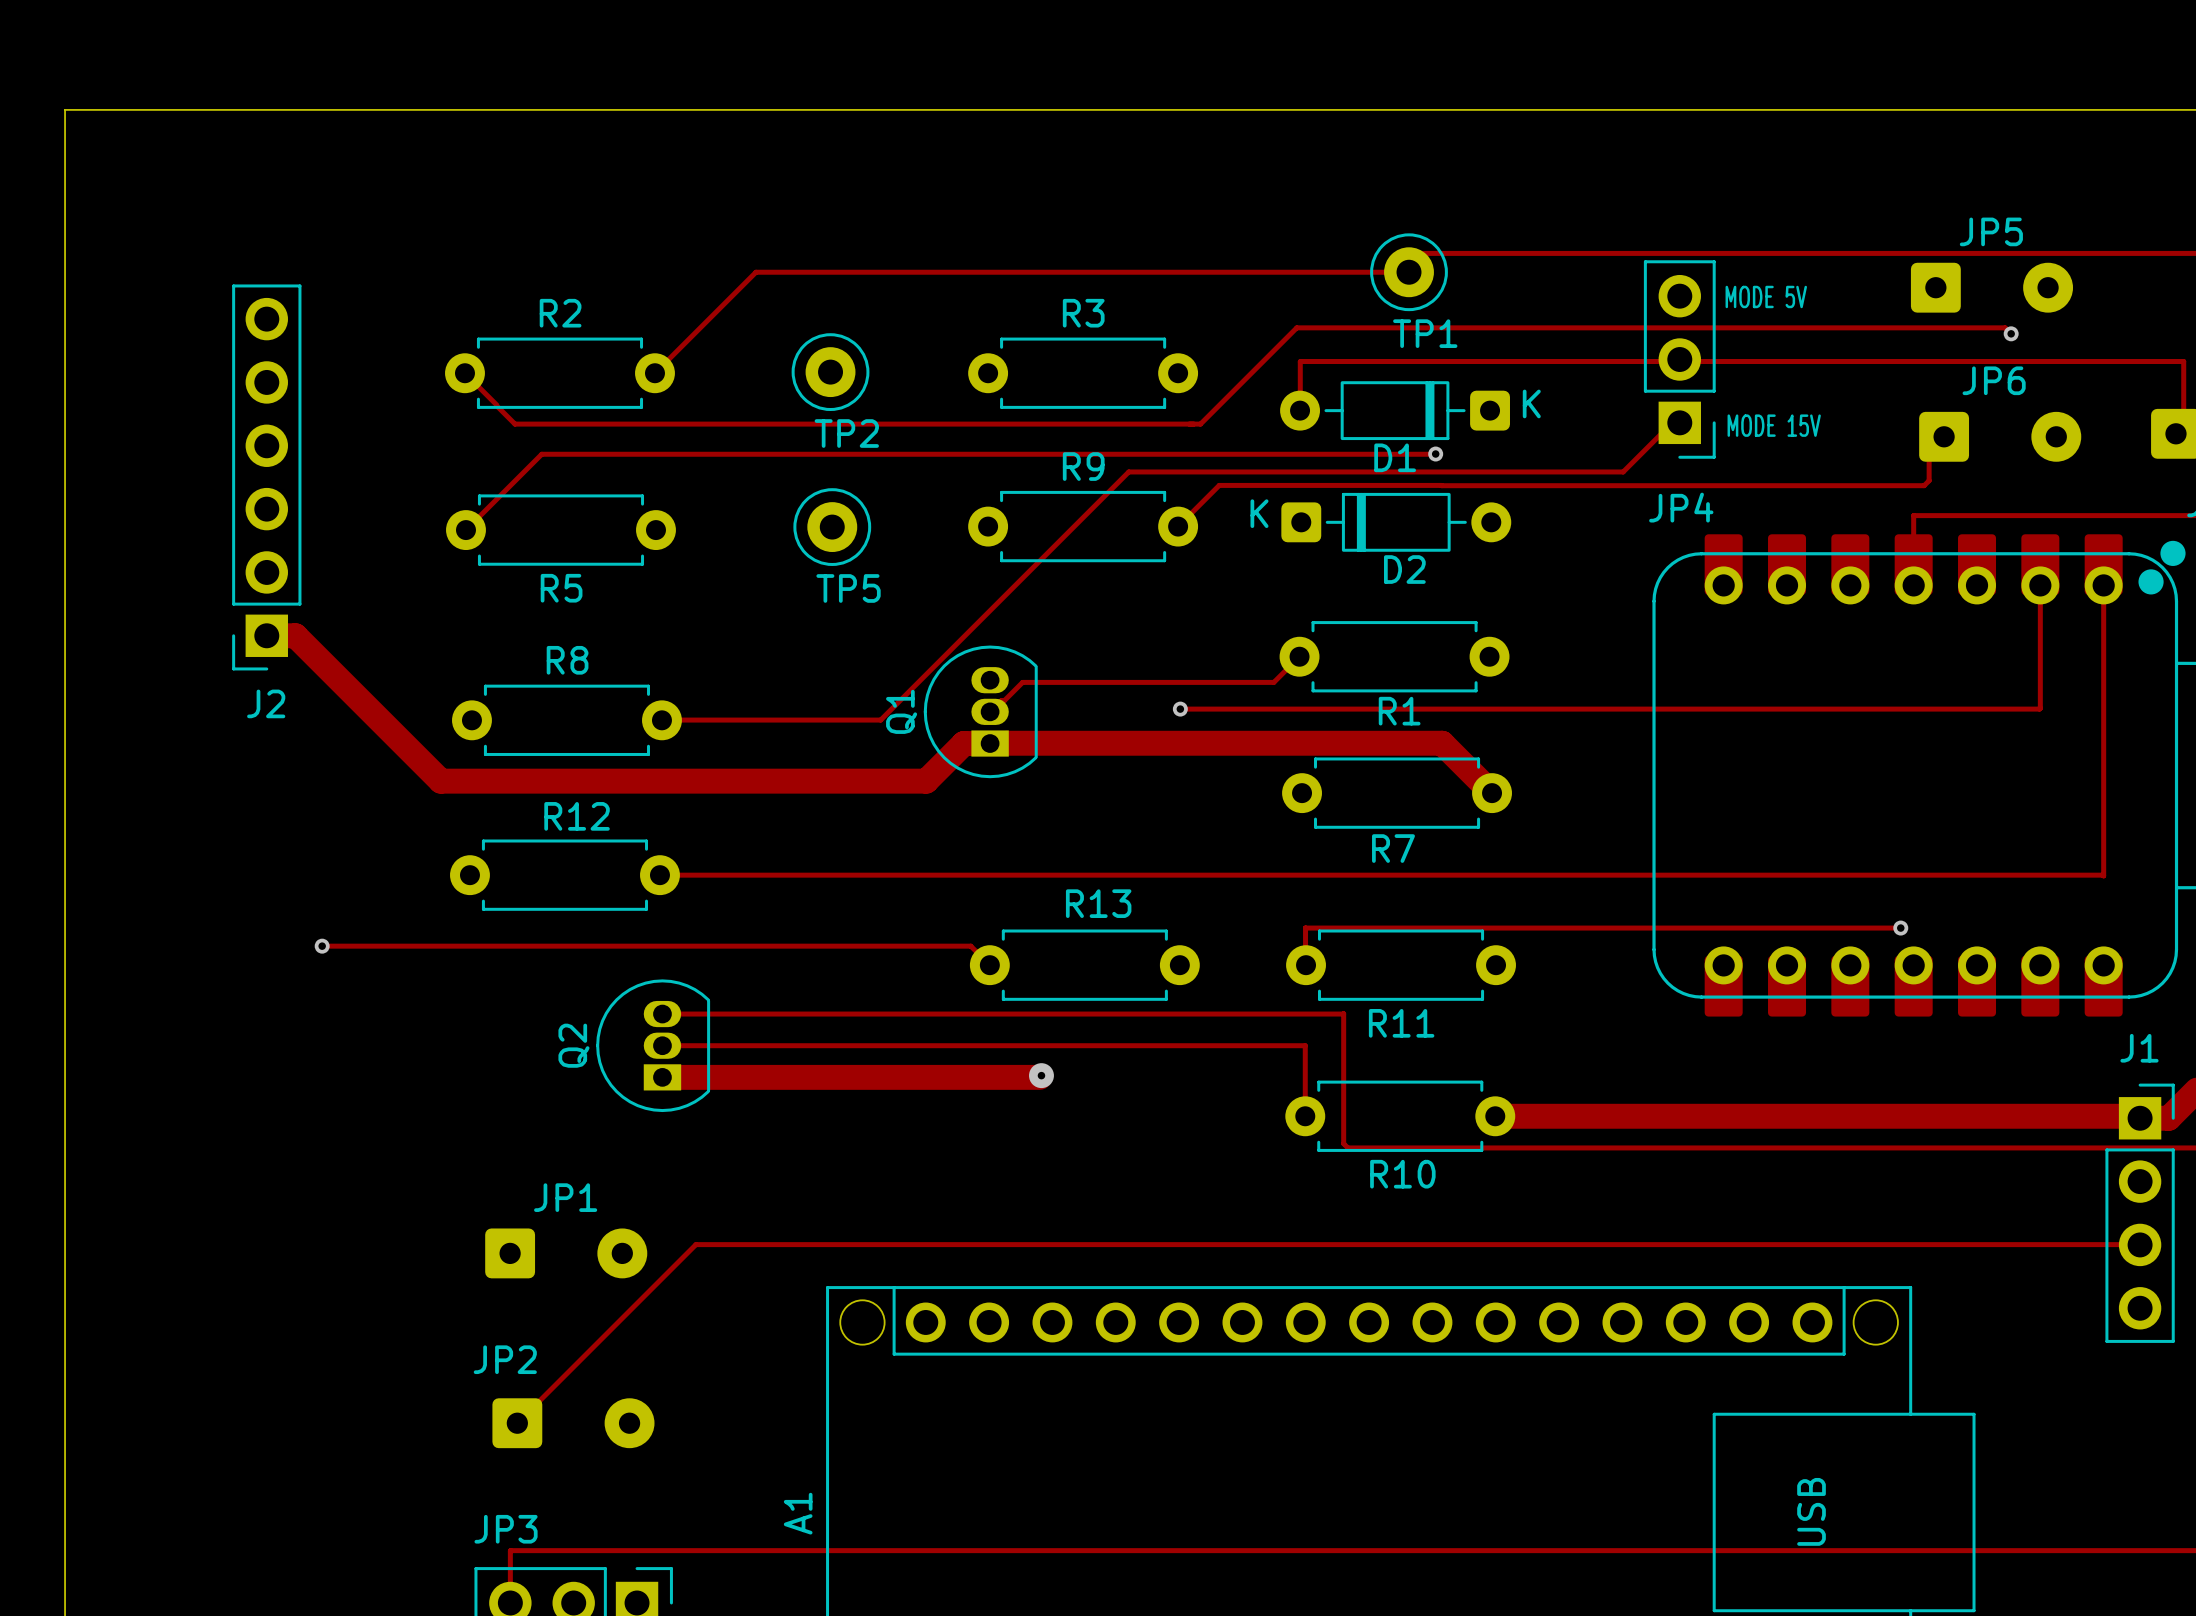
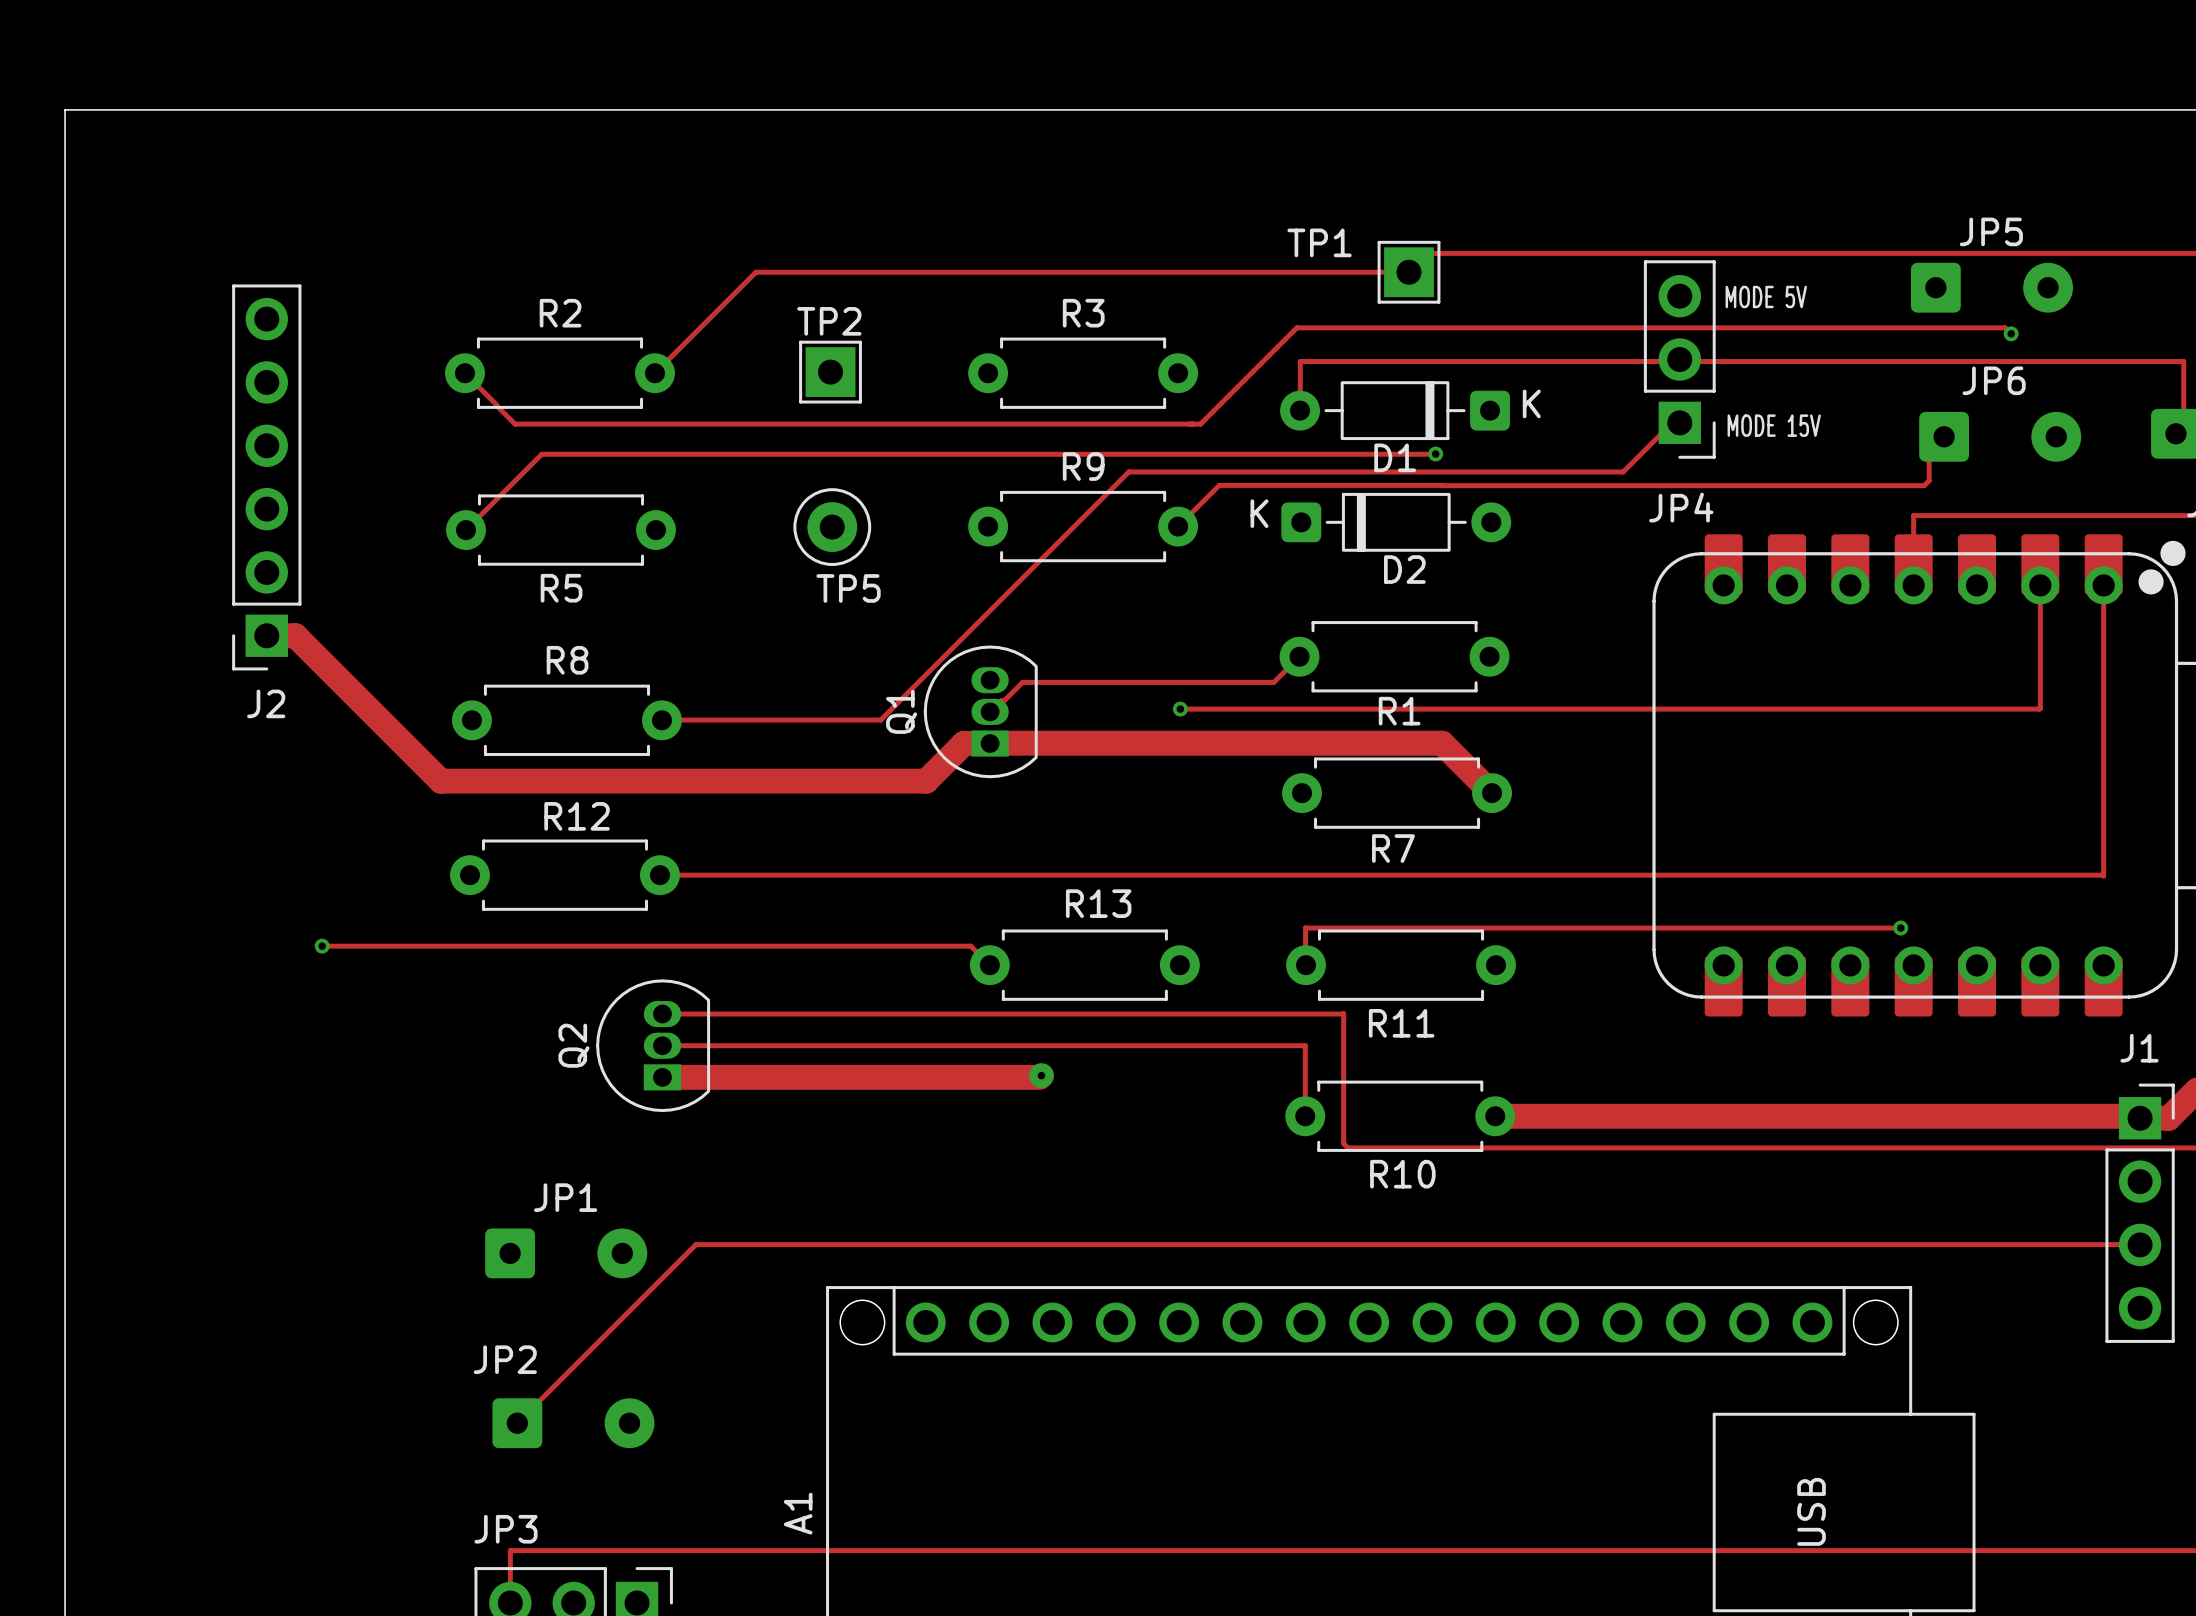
TP1 footprint: [1370, 233, 1448, 312] -> [1377, 240, 1441, 304]
TP2 footprint: [791, 333, 870, 412] -> [799, 340, 862, 404]
TP1 name position: TP1 (1425, 333) -> TP1 (1319, 242)
TP2 name position: TP2 (846, 433) -> TP2 (829, 321)

